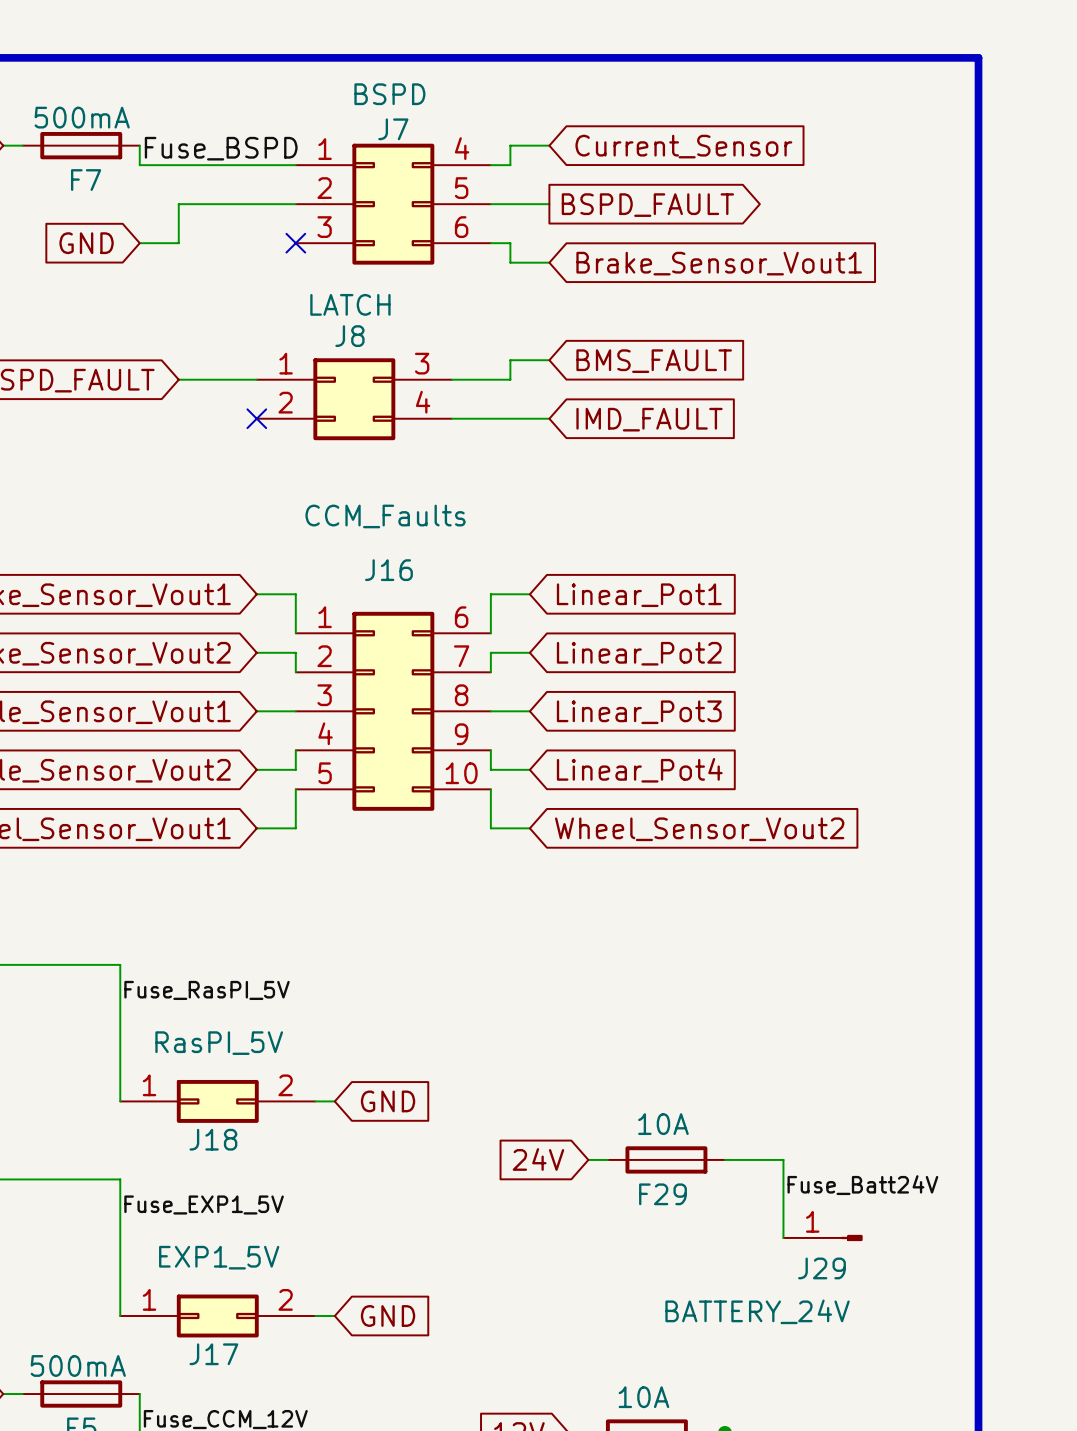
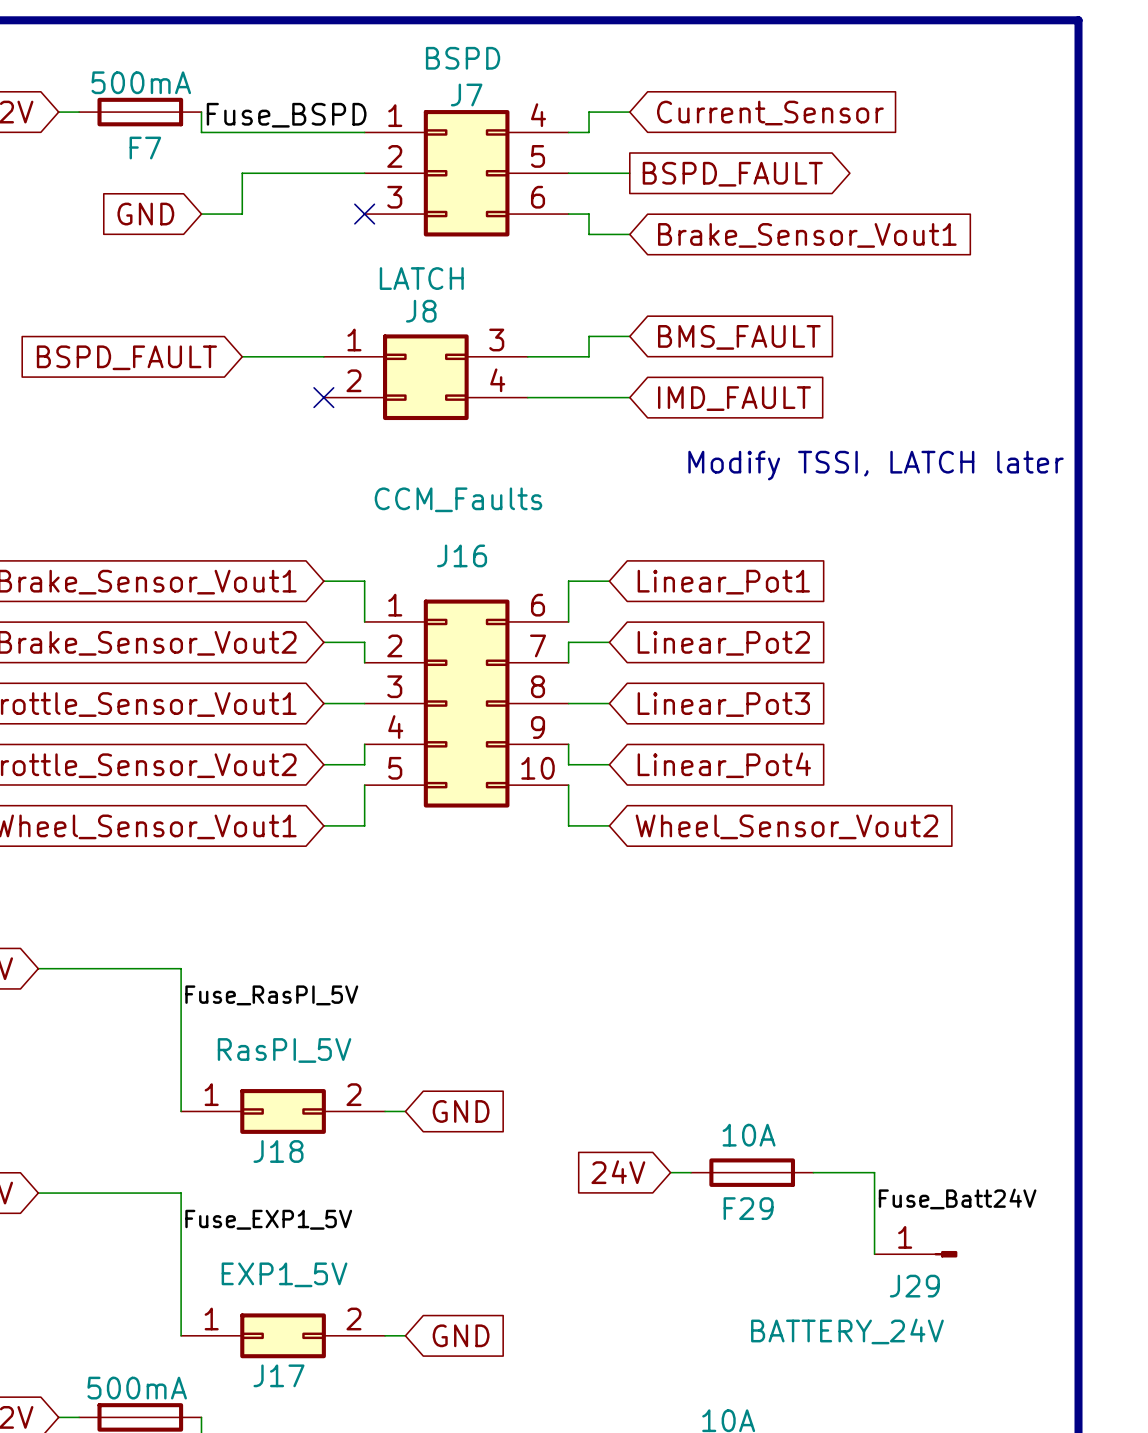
text: none -> Modify TSSI, LATCH later (876, 465)

